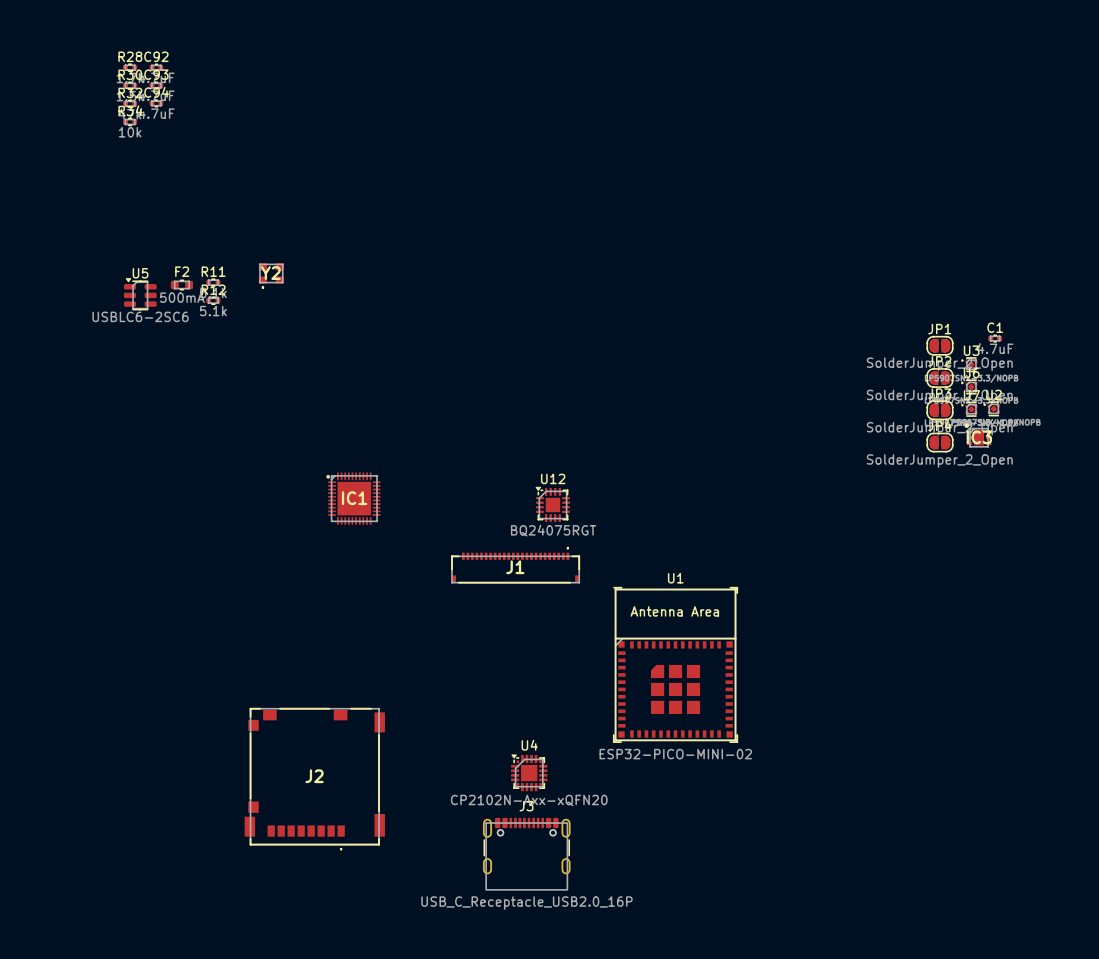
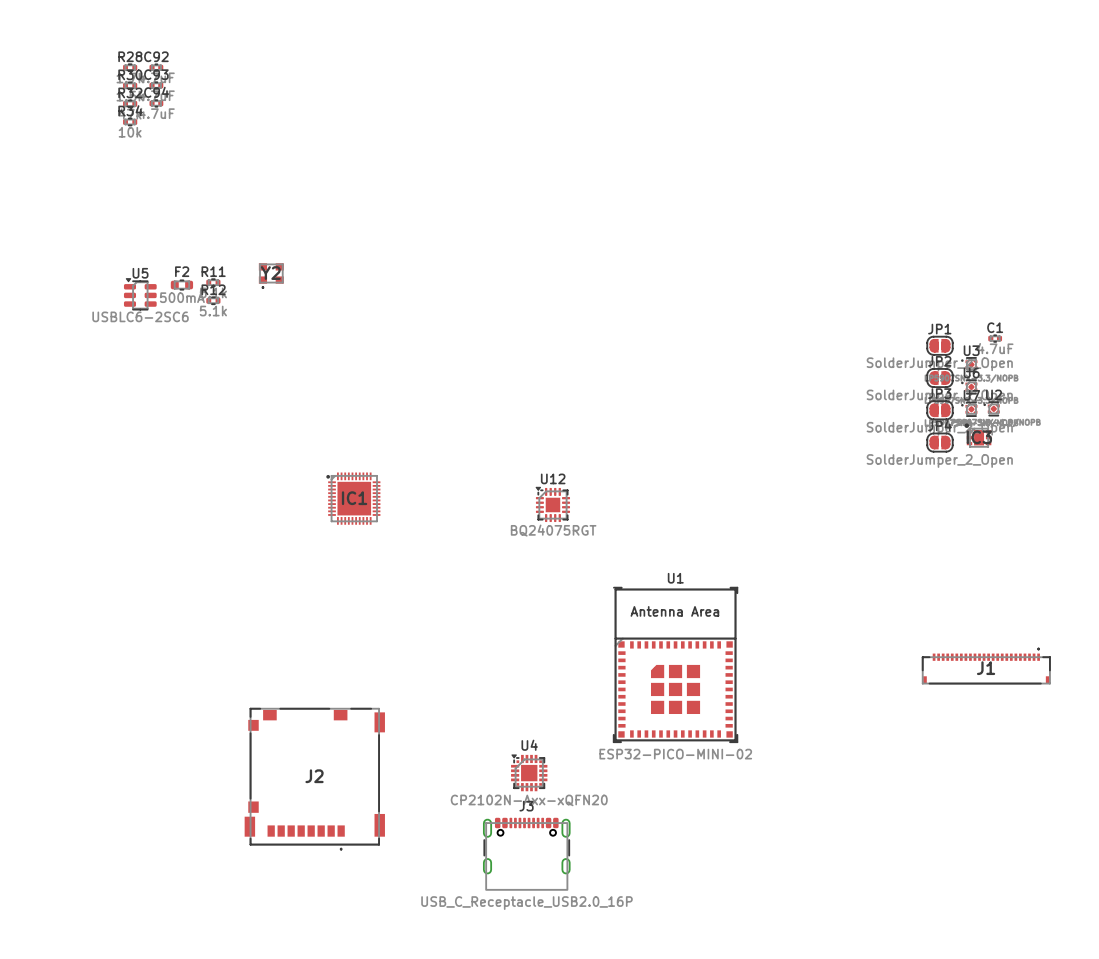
J1 position: (515, 565) -> (986, 666)

